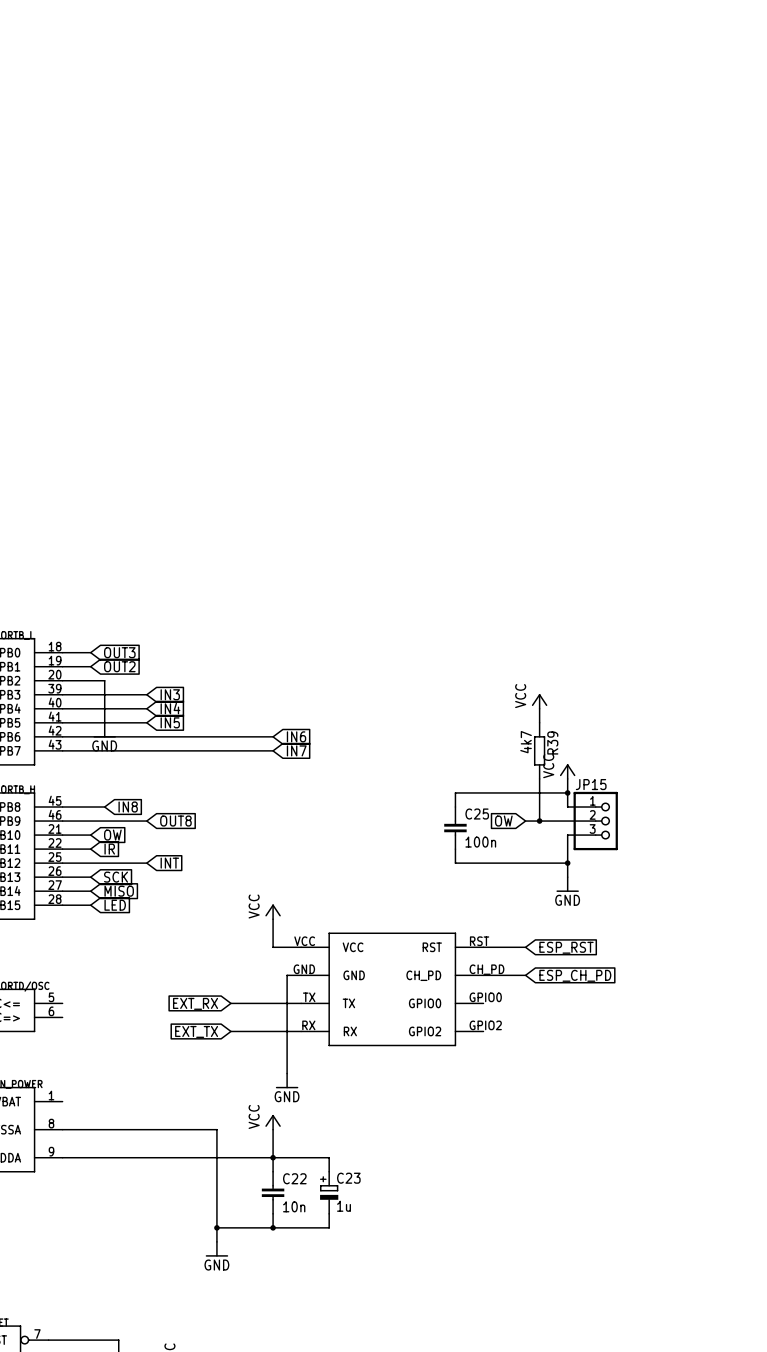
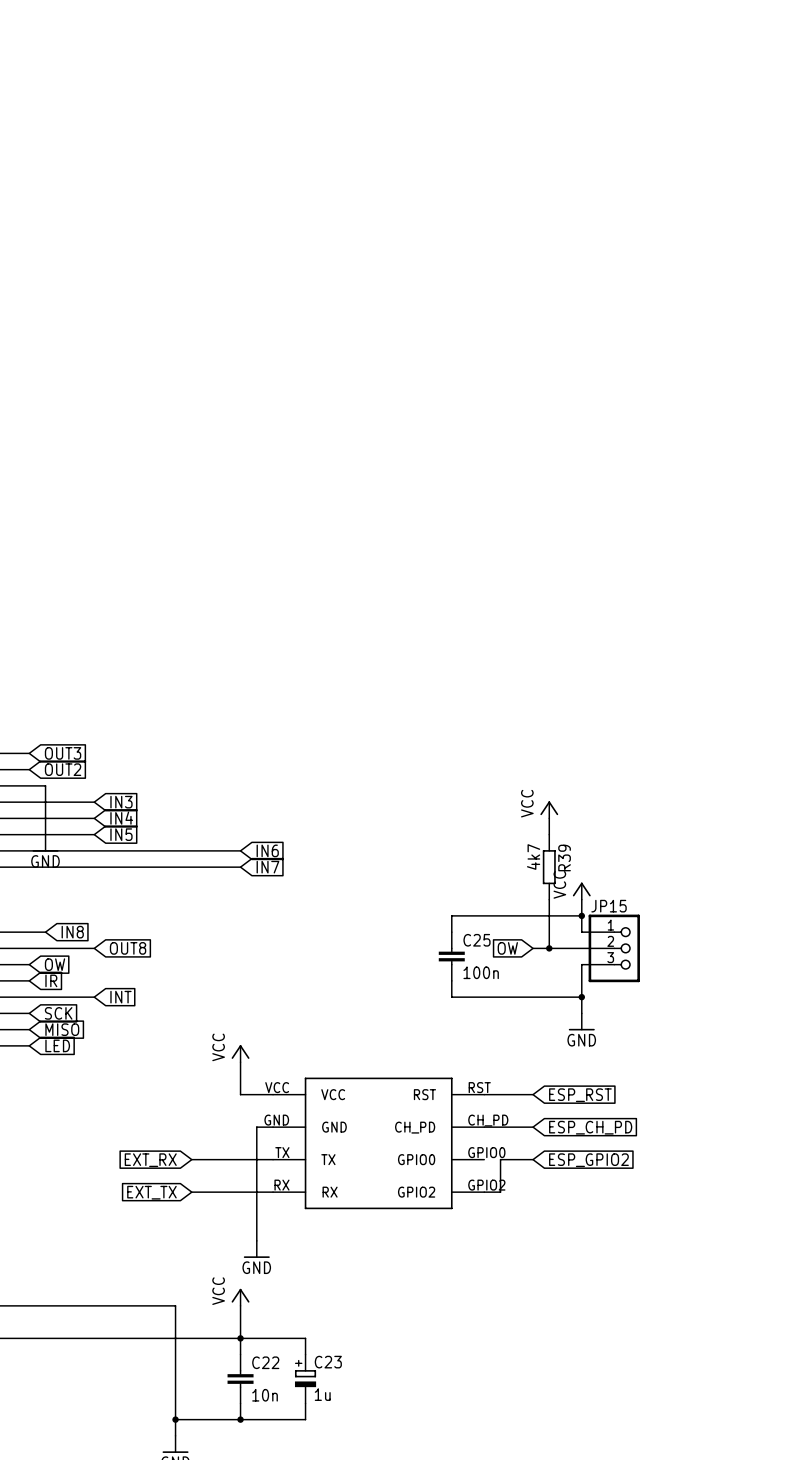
wire: none -> (533, 1159) (500, 1159) (500, 1192) (484, 1192)
global label: none -> ESP_GPIO2 (588, 1160)

